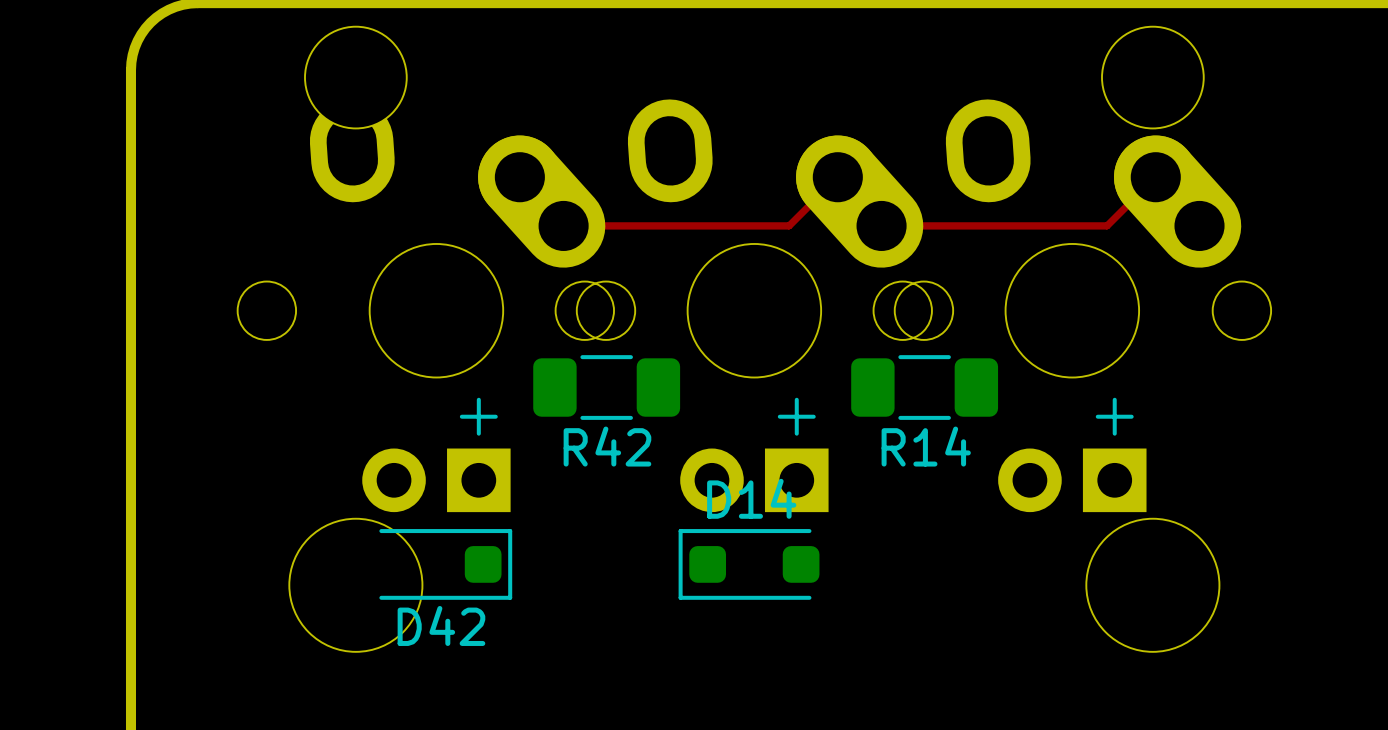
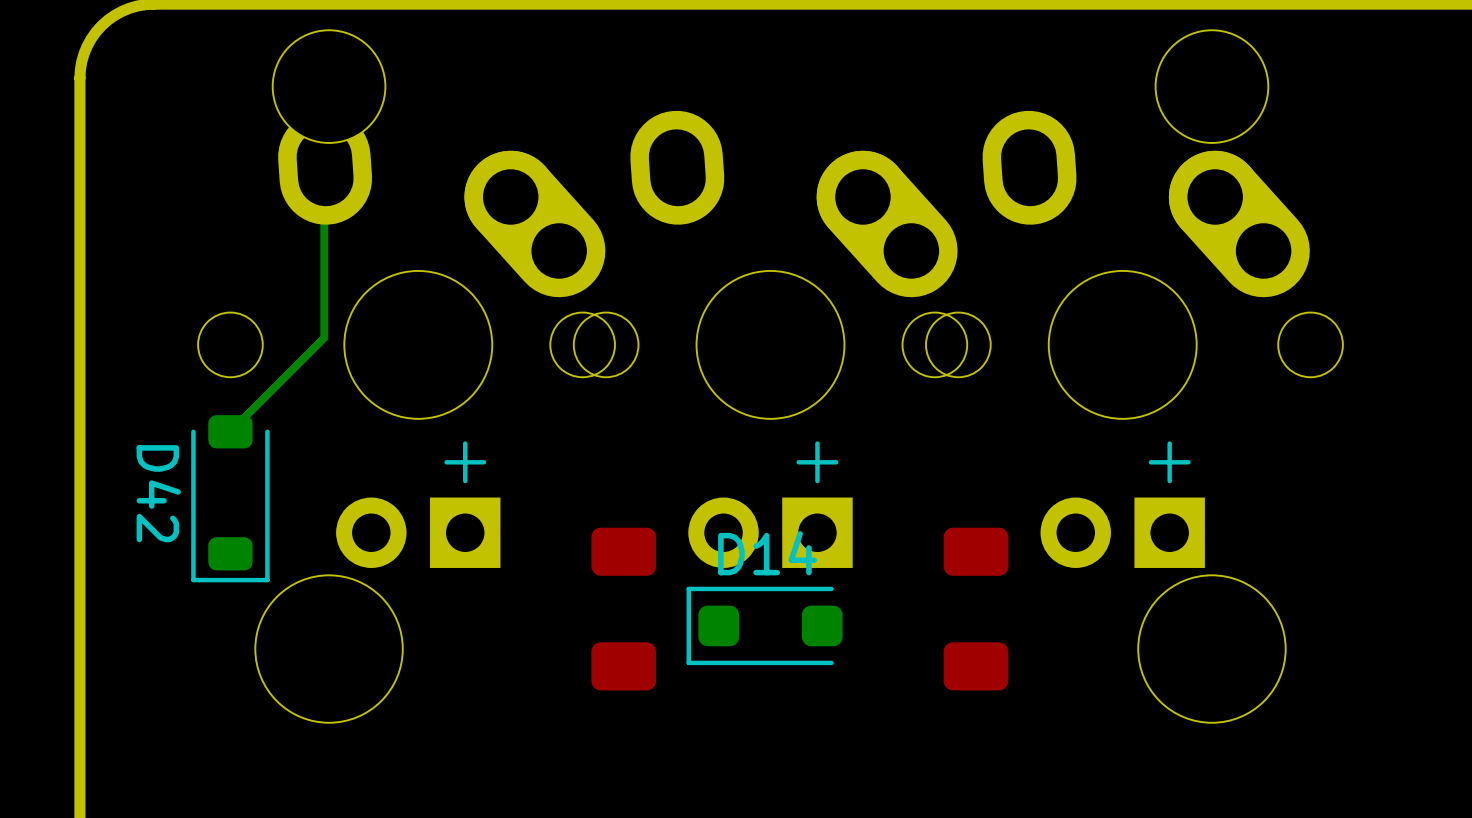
bottom track: none -> (324, 157) (324, 337) (230, 431)
top track: (837, 177) (789, 225) (563, 225) -> none
top track: (1155, 177) (1107, 225) (881, 225) -> none
R42 side: bottom (606, 387) -> top (623, 609)
R14 side: bottom (924, 387) -> top (975, 609)
D42 footprint: [371, 529, 513, 600] -> [191, 415, 270, 583]
D42 name position: D42 (441, 625) -> D42 (158, 493)

